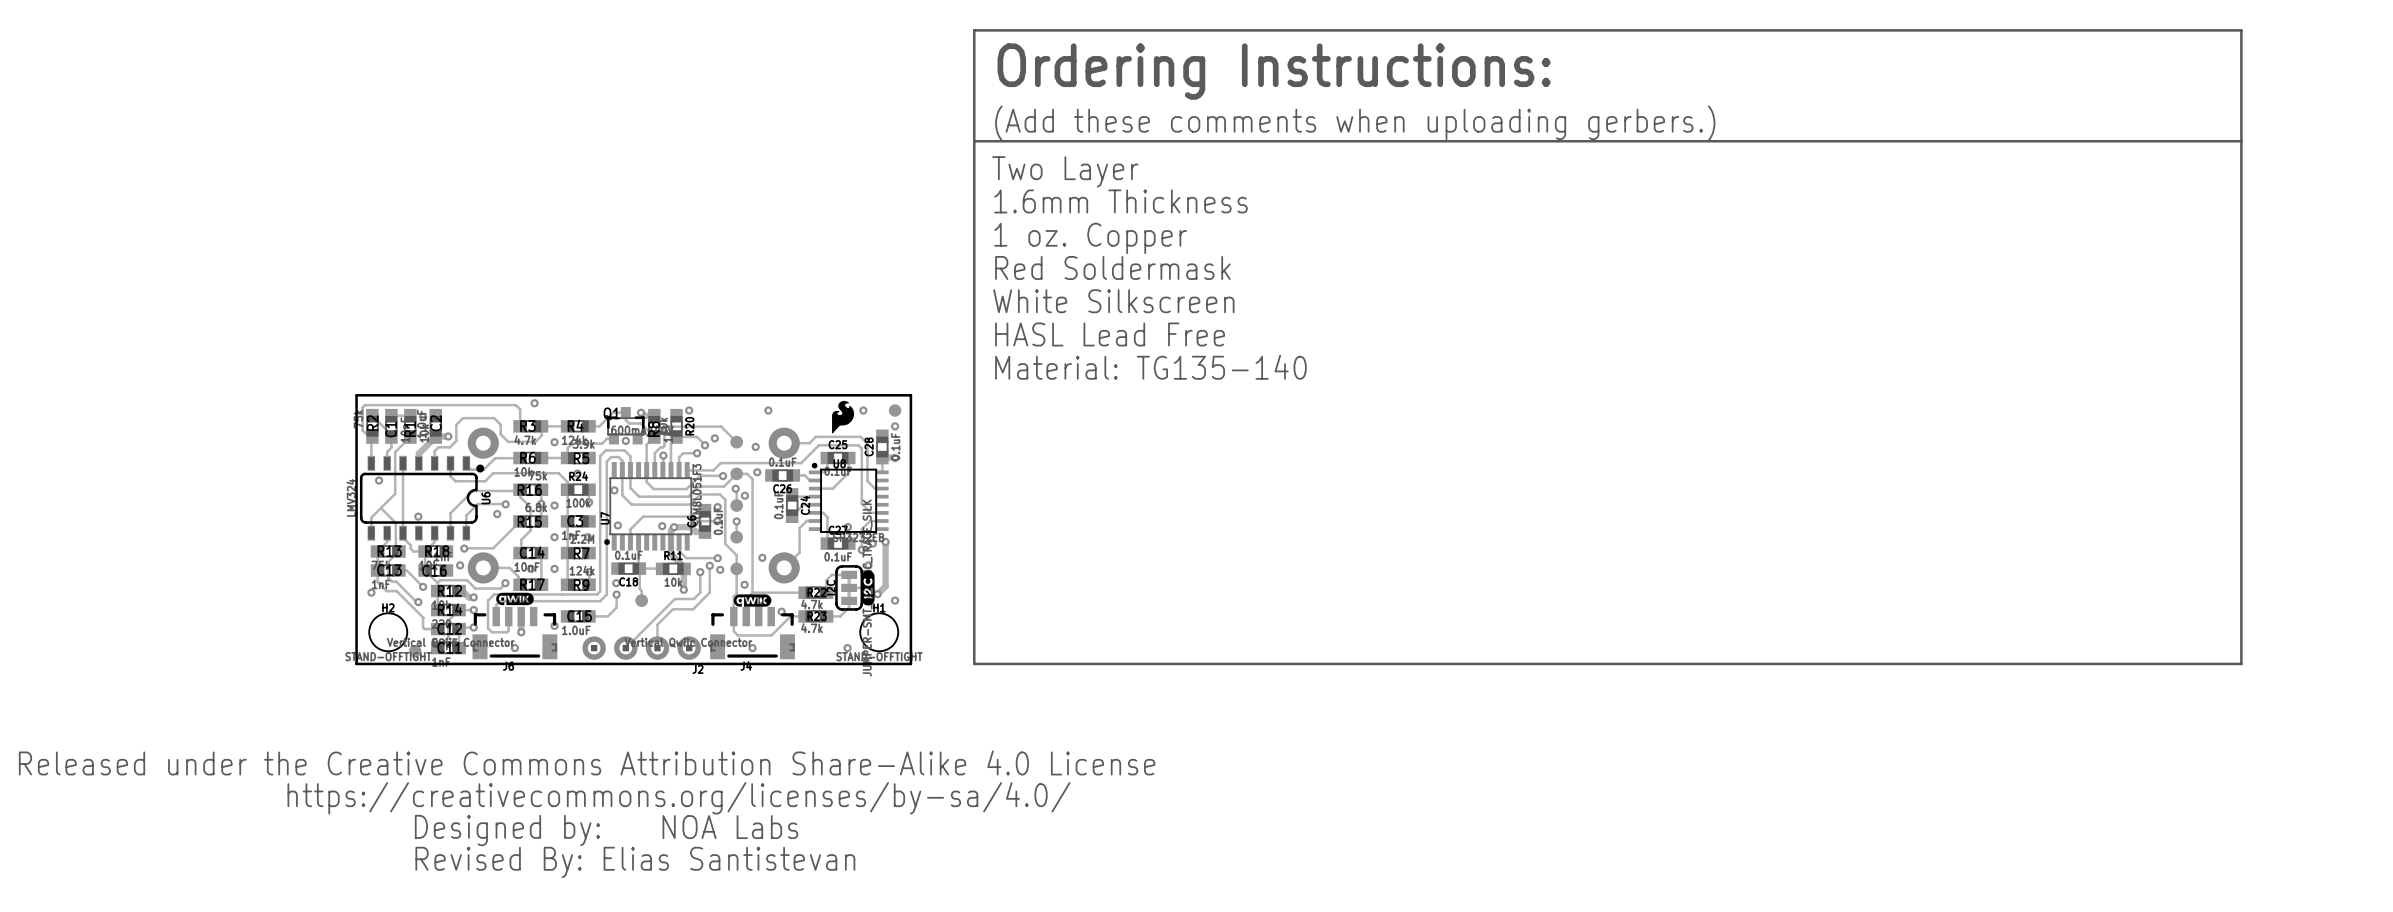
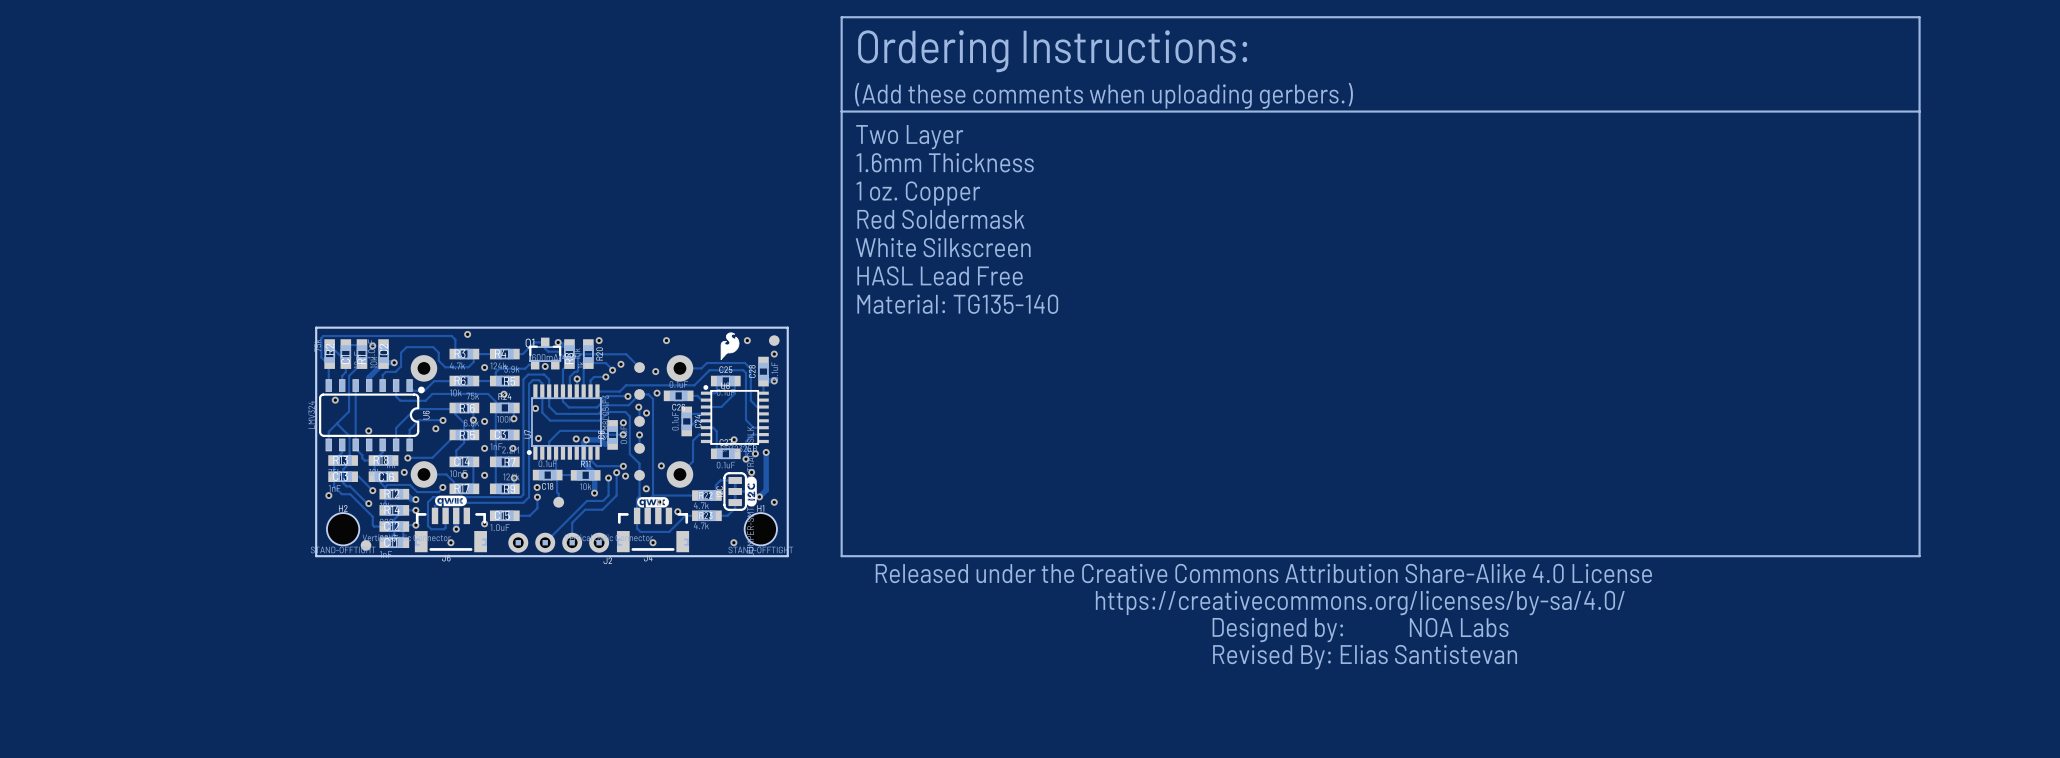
drawing: none -> [875, 563, 1652, 643]
text: none -> NOA Labs (1459, 627)
drawing: [18, 750, 1156, 847] -> none
text: none -> Revised By: Elias Santistevan (1365, 657)
text: NOA Labs (730, 827) -> none
text: Revised By: Elias Santistevan (635, 862) -> none

